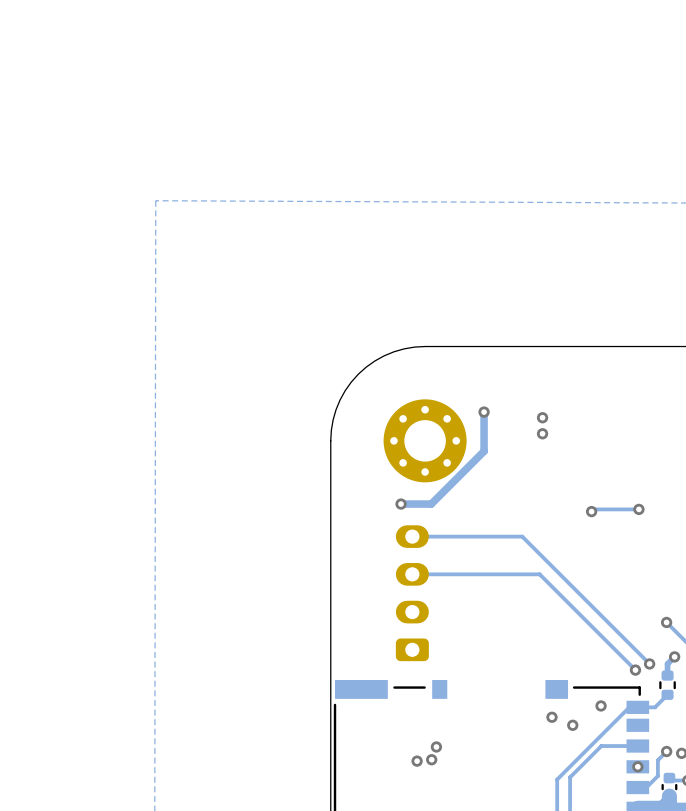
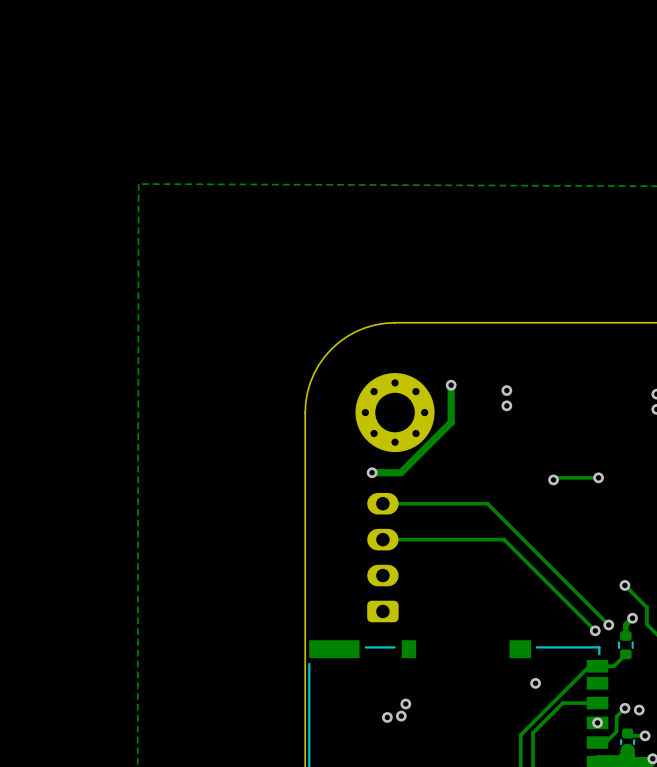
via: (601, 705) -> none
via: (551, 717) -> none

